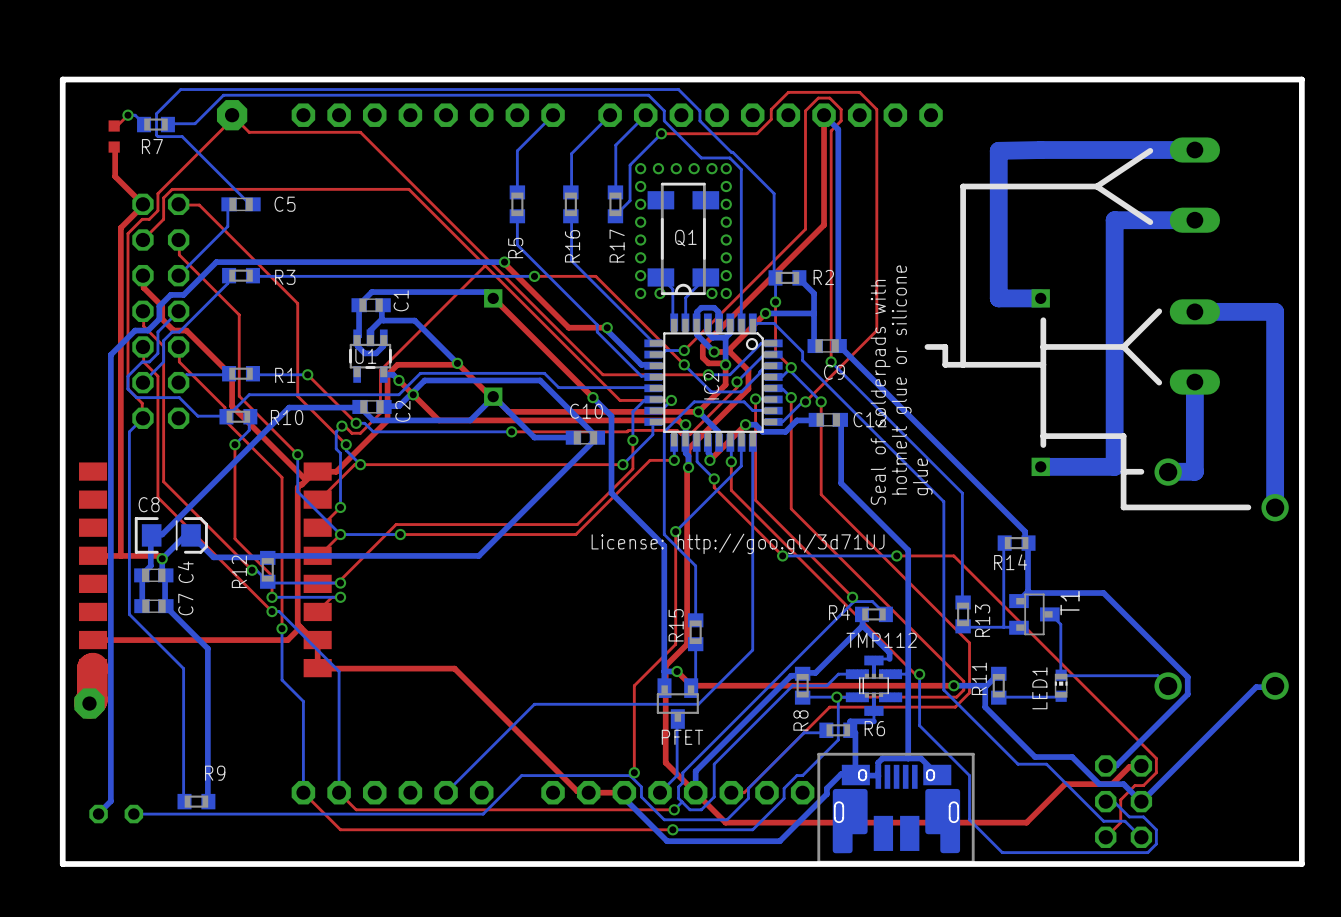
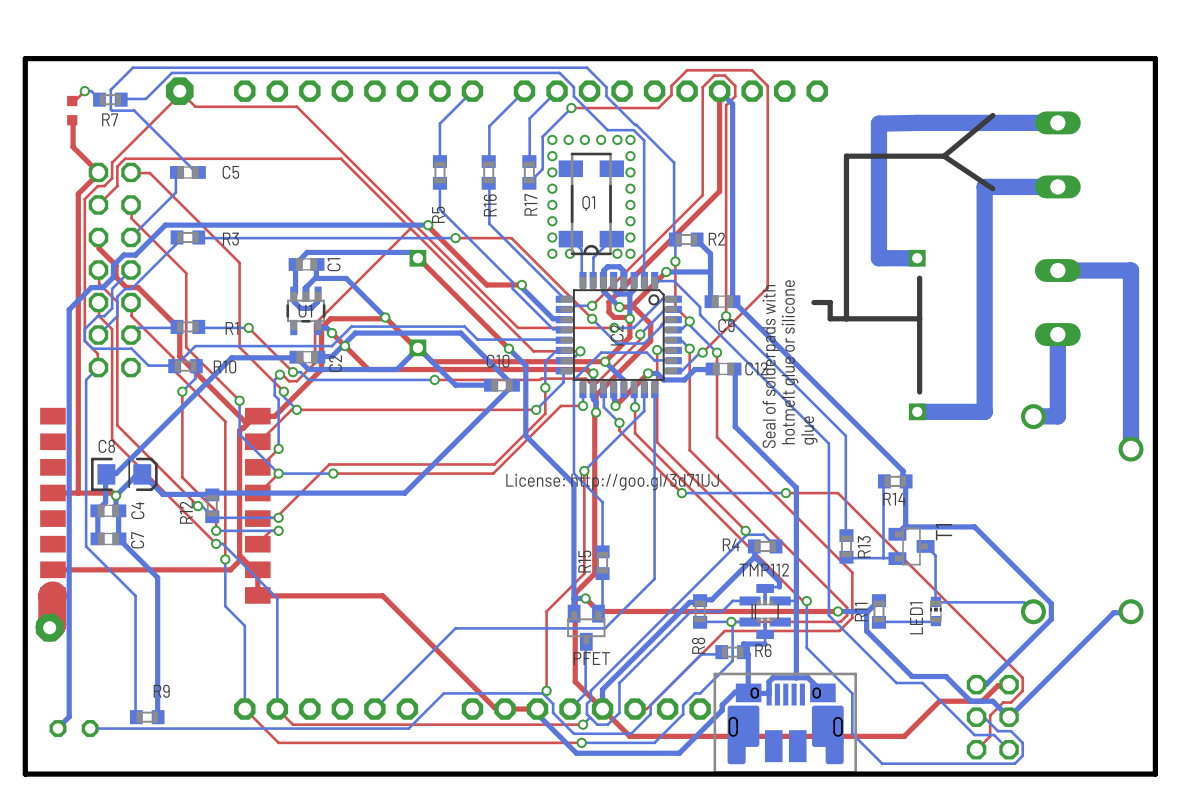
line: none -> (992, 115) (944, 156) (992, 188)
line: (1150, 150) (1096, 186) -> none
line: (1096, 186) (1070, 186) -> none
line: (1096, 186) (1150, 222) -> none
line: (1159, 311) (1123, 346) -> none
line: (1123, 346) (1043, 346) -> none
line: (1123, 346) (1159, 382) -> none
line: (1043, 436) (1123, 436) (1123, 507) (1248, 507) -> none
line: (1141, 471) (1123, 471) -> none

